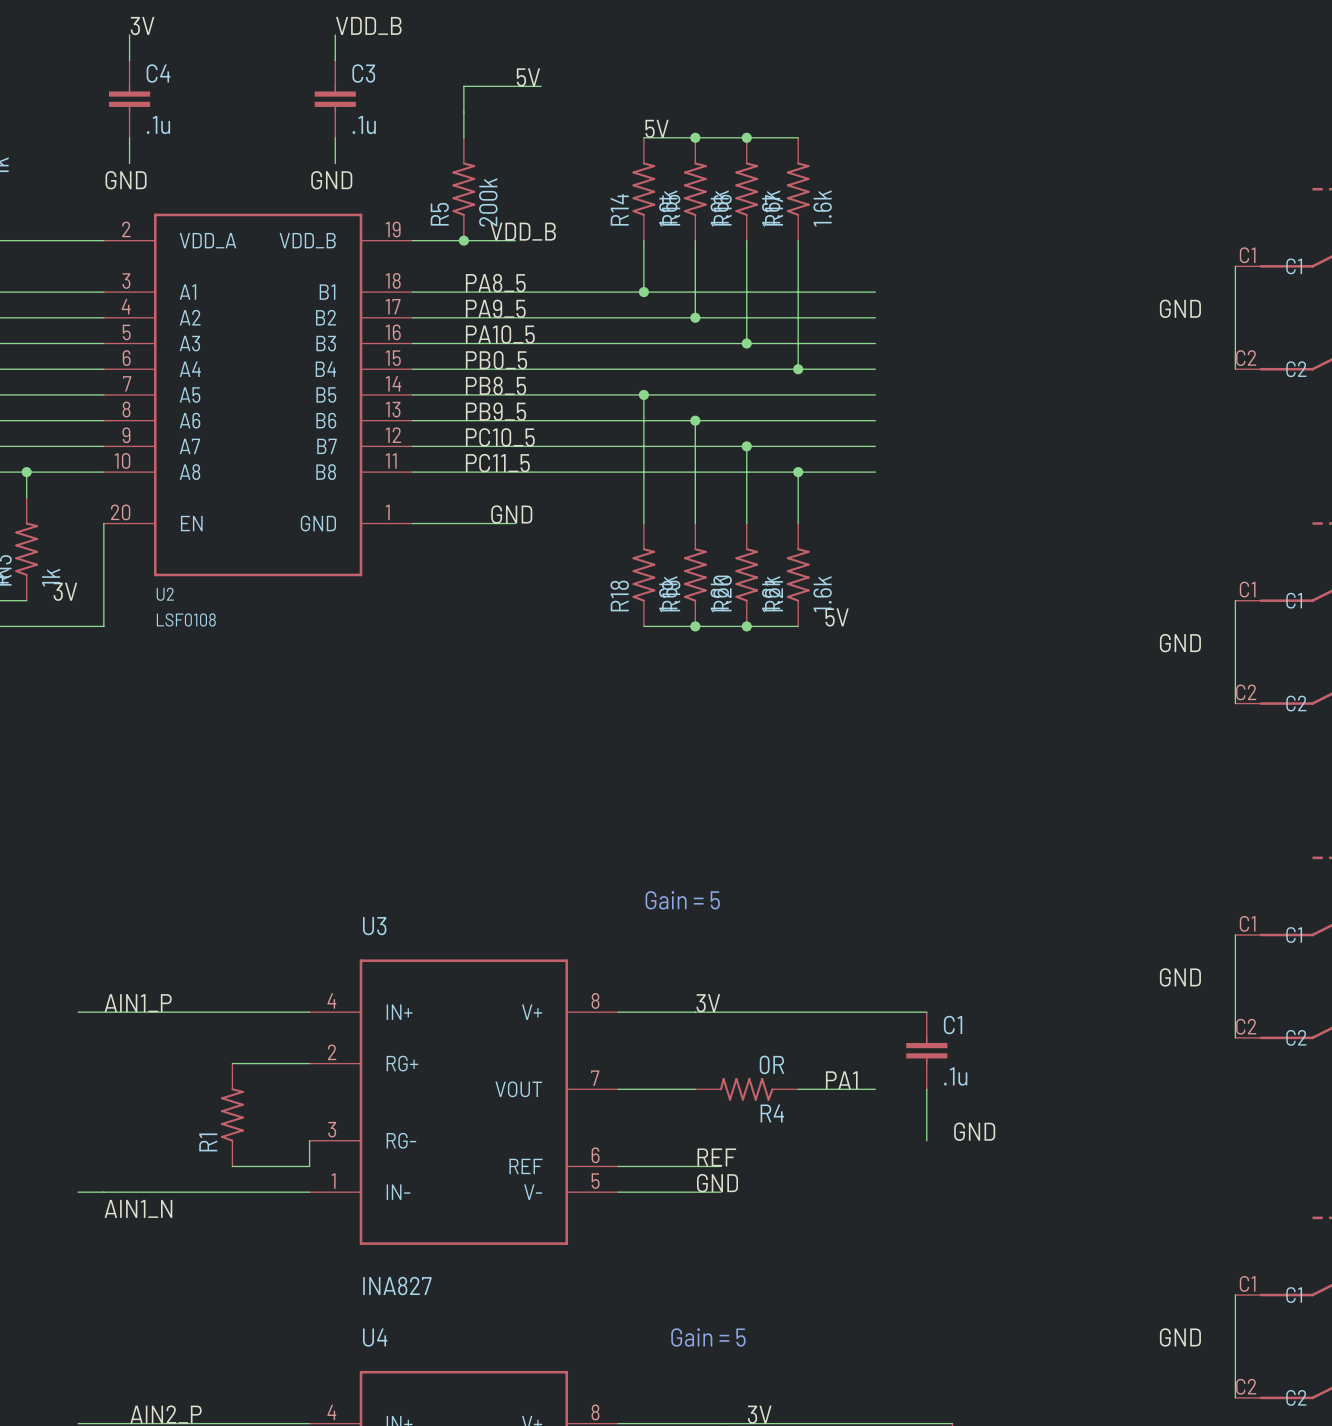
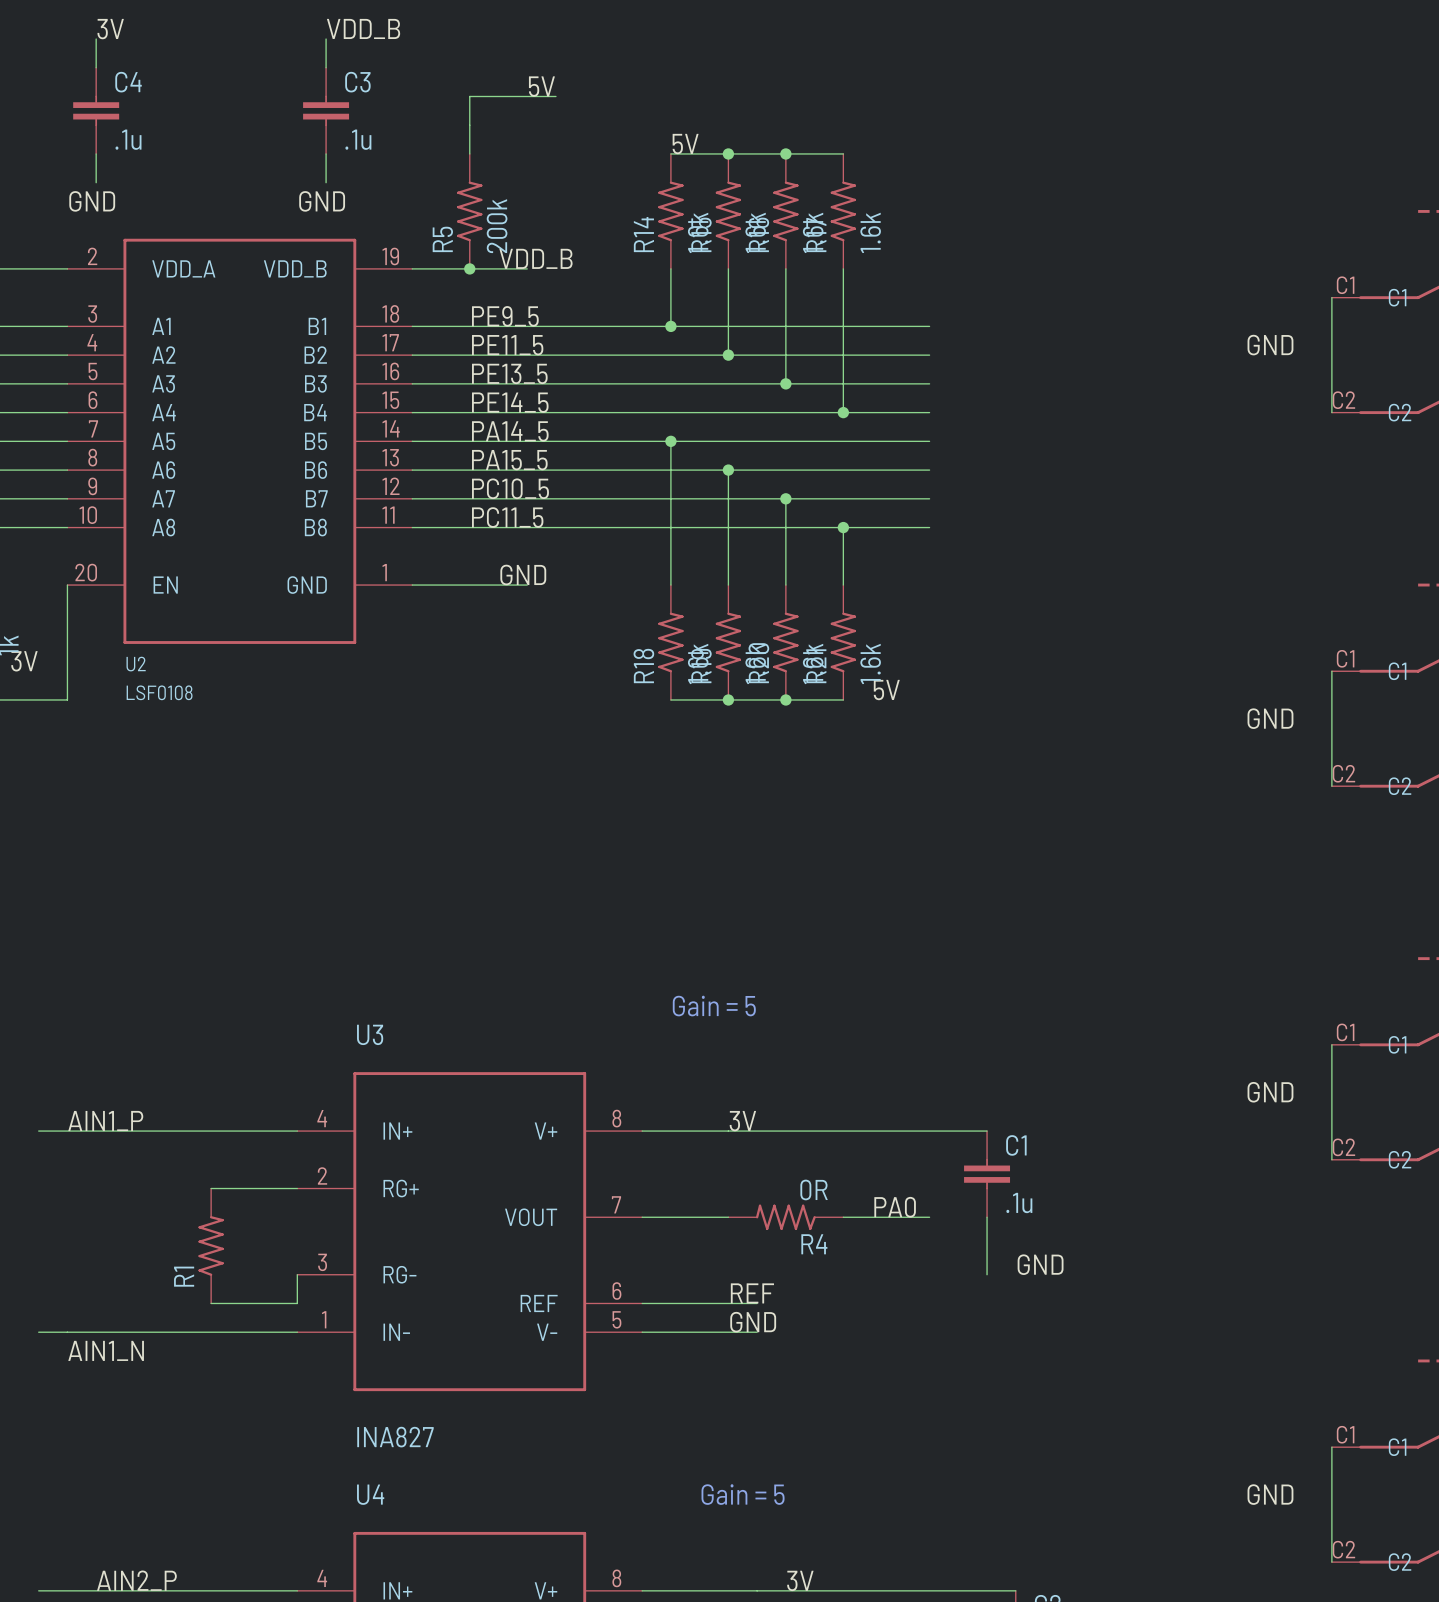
label: PA8_5 (495, 283) -> PE9_5 (505, 316)
label: PA9_5 (495, 308) -> PE11_5 (507, 345)
label: PA10_5 (500, 334) -> PE13_5 (509, 373)
label: PB0_5 (496, 360) -> PE14_5 (510, 402)
label: PB8_5 (495, 385) -> PA14_5 (510, 431)
label: PB9_5 (495, 411) -> PA15_5 (509, 460)
label: PA1 (841, 1080) -> PA0 (895, 1207)

